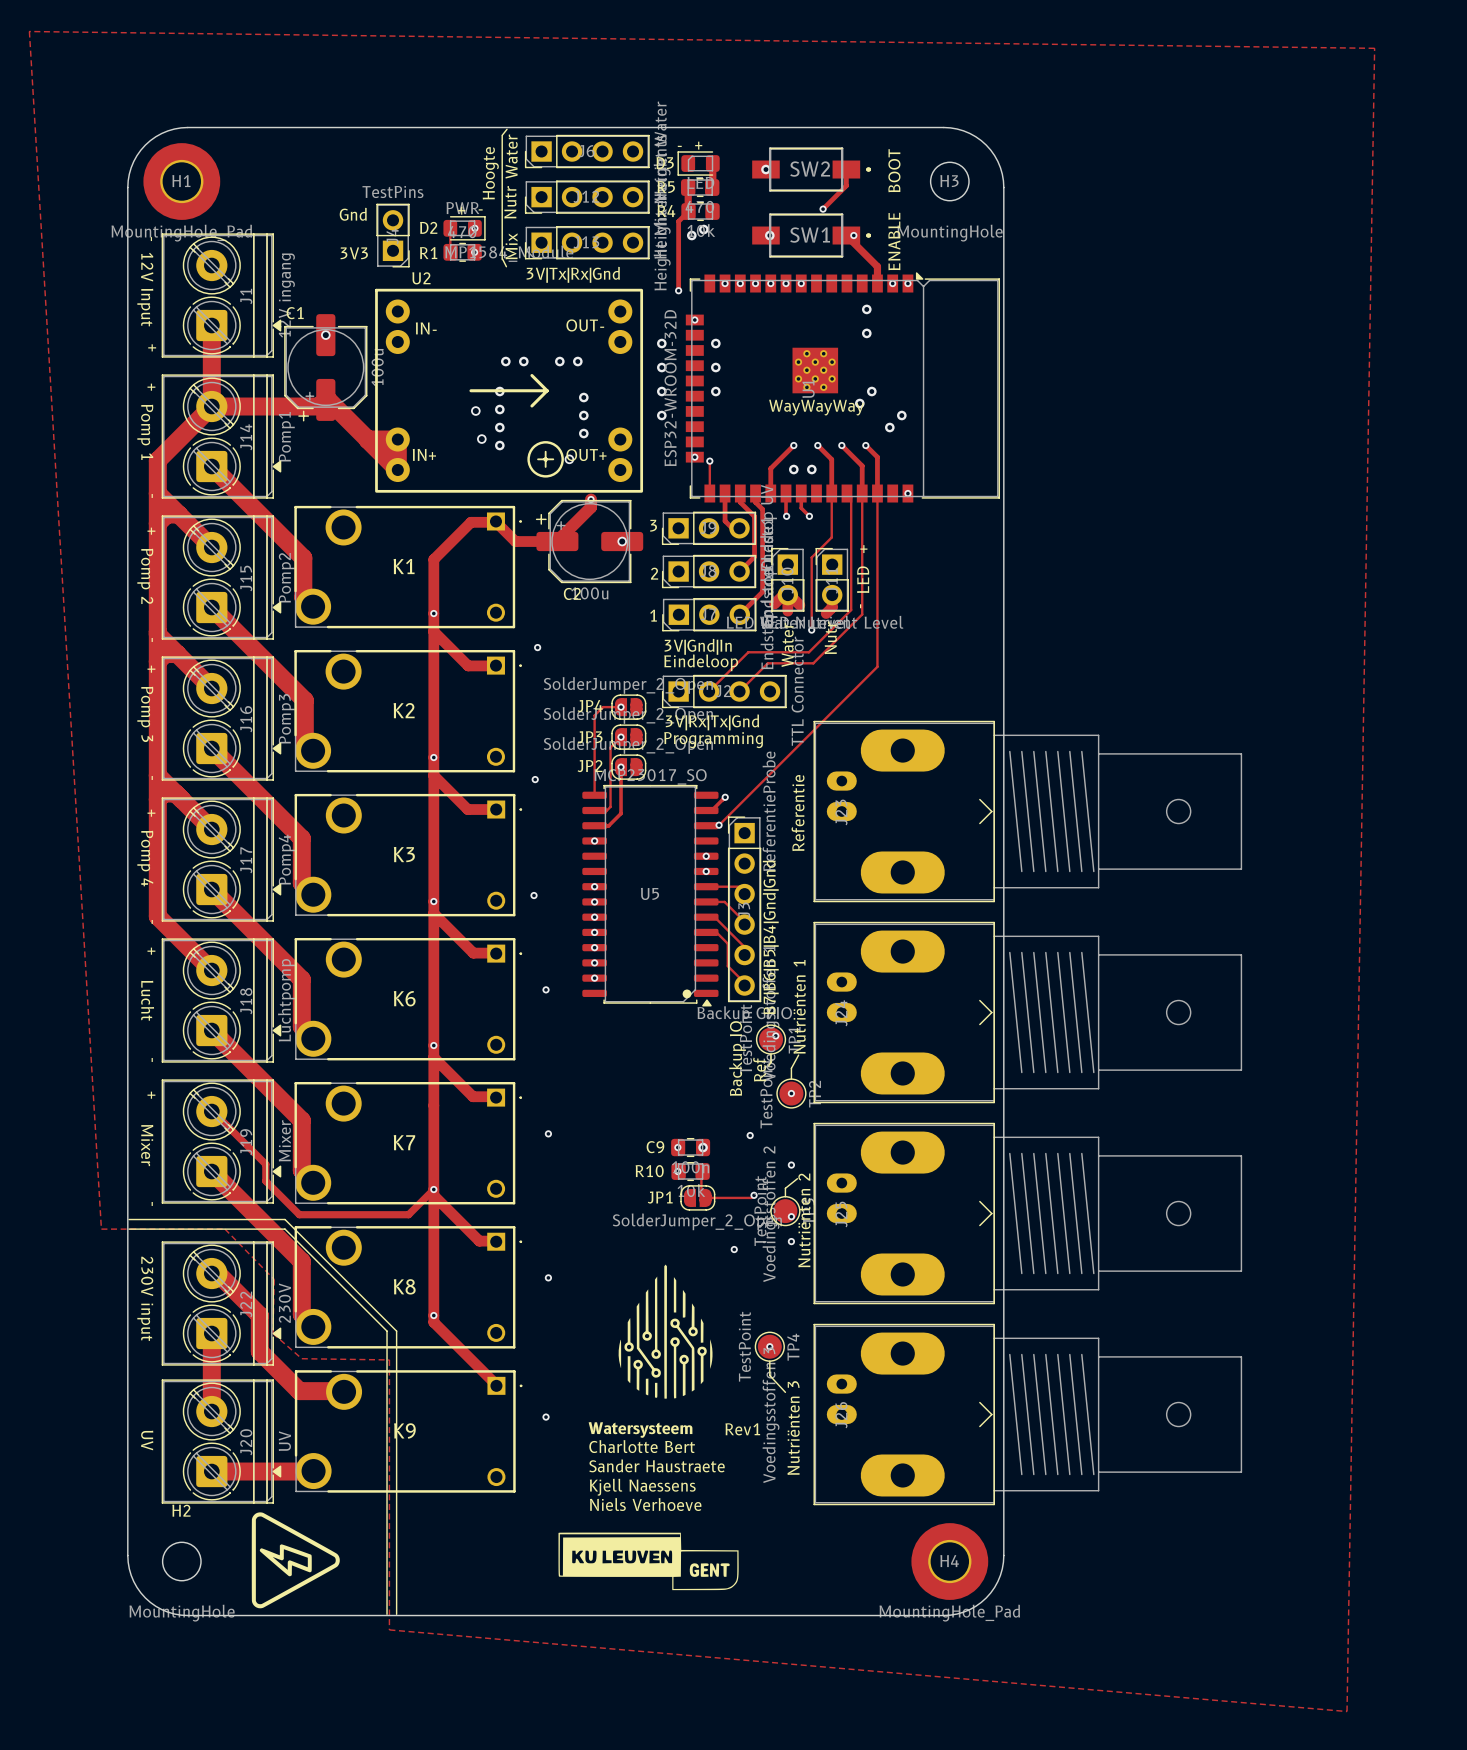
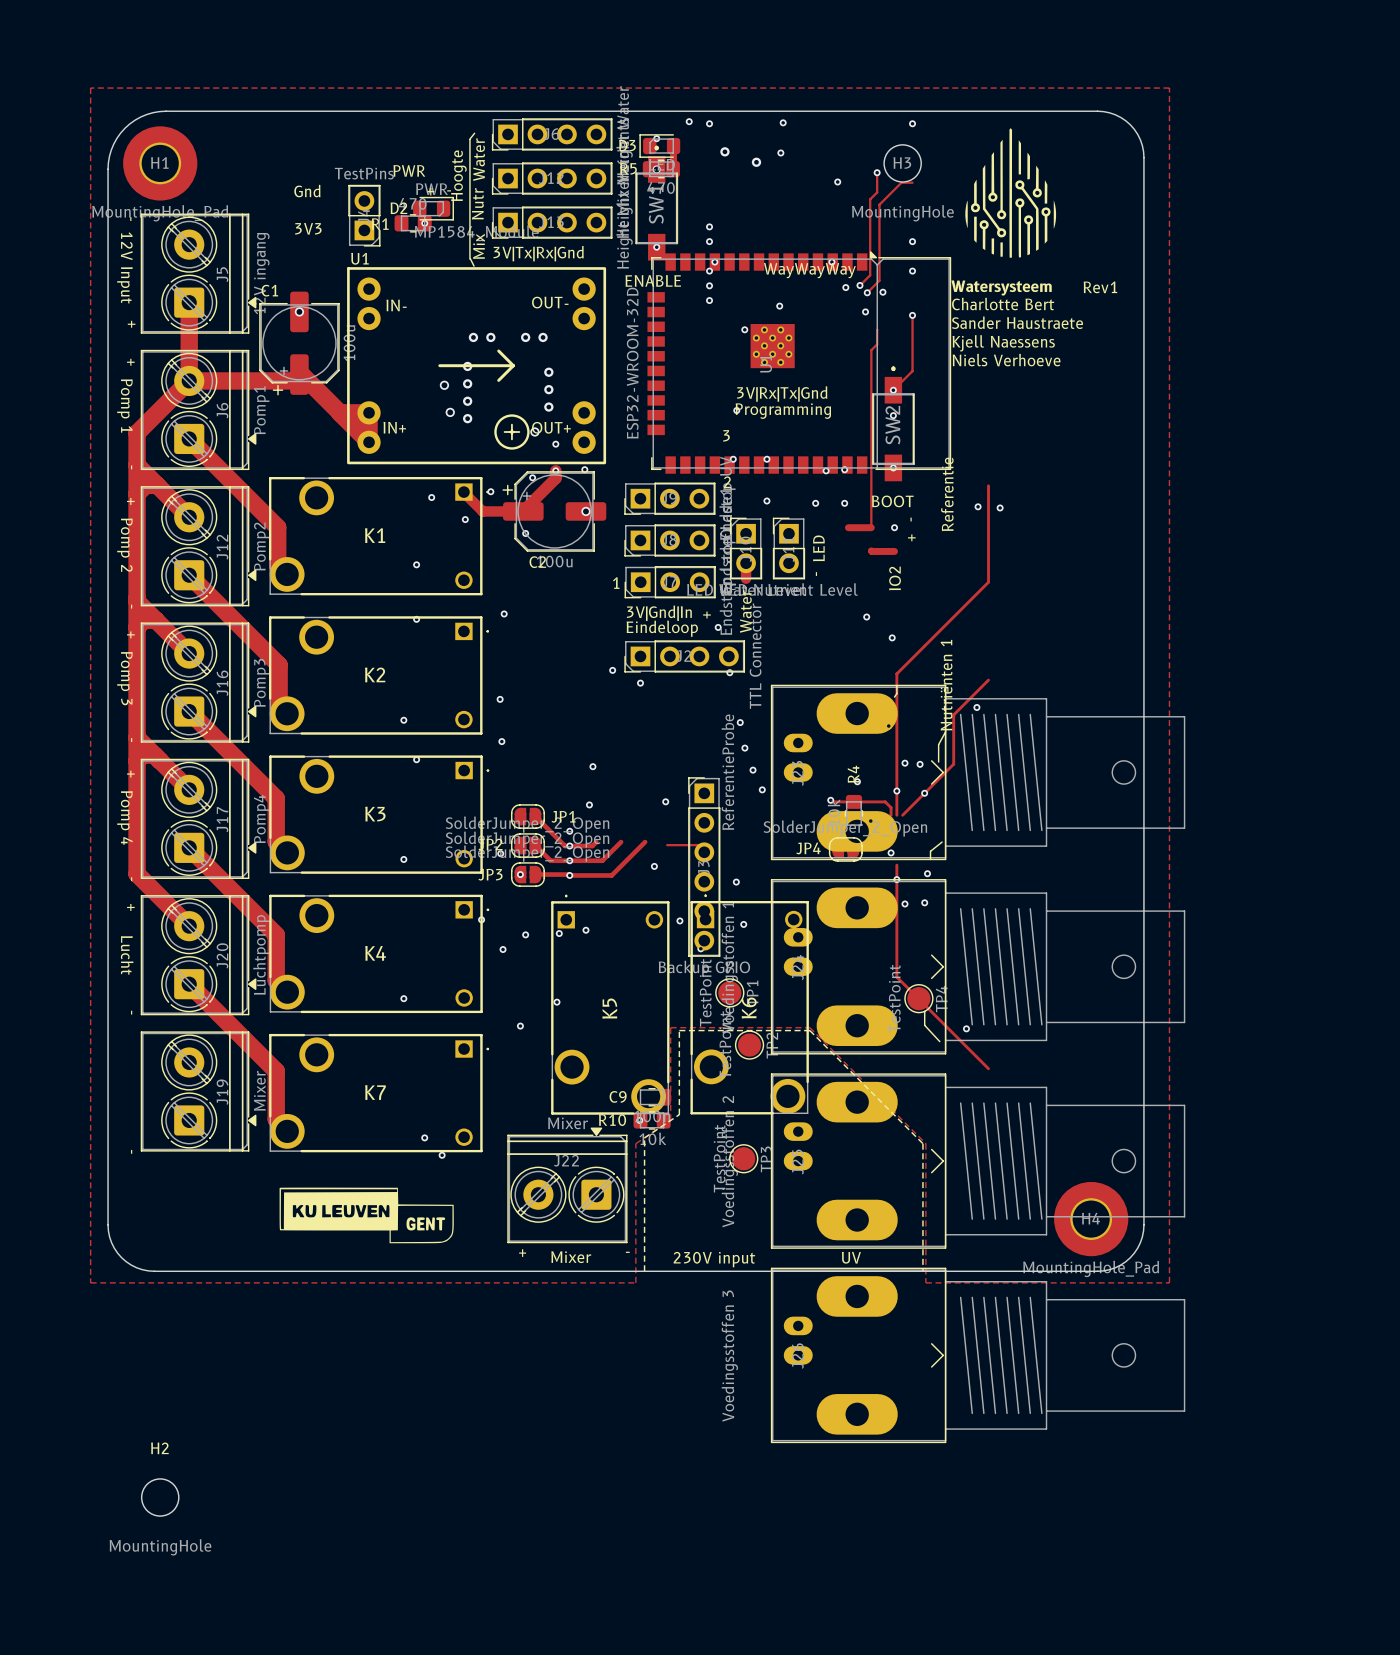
zone outline: (29, 31) (101, 1229) (225, 1229) (274, 1279) (273, 1333) (301, 1358) (389, 1359) (389, 1629) (1347, 1711) (1374, 48) (29, 31) -> (90, 88) (90, 1282) (635, 1282) (635, 1143) (670, 1120) (670, 1027) (809, 1027) (925, 1143) (925, 1282) (1169, 1282) (1169, 88) (90, 88)
board edge: (943, 127) (957, 129) (969, 133) (986, 145) (997, 161) (1002, 174) (1003, 187) (1003, 1555) (1002, 1568) (994, 1587) (981, 1602) (969, 1609) (957, 1614) (943, 1615) (187, 1615) (168, 1612) (150, 1602) (140, 1592) (133, 1581) (128, 1562) (127, 1279) -> (896, 111) (1103, 111) (1115, 114) (1125, 120) (1134, 129) (1142, 145) (1143, 157) (1143, 1224) (1142, 1236) (1134, 1253) (1120, 1265) (1109, 1269) (1097, 1271) (154, 1271) (136, 1267) (121, 1257) (111, 1242) (108, 1224)
line: (507, 129) (502, 135) -> (474, 133) (469, 139)
line: (502, 135) (502, 156) -> (469, 238) (469, 259)
via: none -> (689, 121)
via: none -> (783, 122)
via: none -> (709, 123)
via: none -> (912, 123)
drawing: none -> [965, 128, 1057, 258]
text: - + (690, 145) -> none
via: none -> (656, 138)
text position: Water (511, 156) -> Water (479, 159)
SW2 rotation: 0° (811, 169) -> 90° counterclockwise (893, 423)
SW2 position: (811, 169) -> (893, 423)
track: (846, 169) (846, 185) (823, 209) -> none
via: none -> (780, 152)
text: BOOT (894, 170) -> none
text position: Hoogte (490, 173) -> Hoogte (458, 175)
via: none -> (756, 162)
track: (688, 187) (688, 211) (678, 221) (678, 290) -> none
via: none -> (656, 169)
text: none -> PWR (409, 170)
track: none -> (877, 172) (877, 192) (870, 199) (870, 275) (859, 285)
via: none -> (877, 172)
via: none -> (837, 181)
track: none -> (912, 182) (901, 182) (879, 204) (879, 280) (867, 292)
text position: Nutr (510, 202) -> Nutr (477, 203)
via: (823, 209) -> none
R4 rotation: 0° (700, 211) -> 90° clockwise (853, 813)
R4 position: (700, 211) -> (853, 813)
text position: Gnd (353, 214) -> Gnd (307, 191)
via: (474, 228) -> none
via: (703, 229) -> none
via: (691, 235) -> none
via: (769, 235) -> none
SW1 rotation: 0° (811, 235) -> 90° counterclockwise (656, 203)
SW1 position: (811, 235) -> (656, 203)
track: (853, 235) (846, 235) (877, 266) (877, 283) -> none
via: (853, 235) -> none
text rotation: 0° (894, 241) -> 90° clockwise (653, 280)
text position: ENABLE (894, 241) -> ENABLE (653, 280)
via: none -> (424, 223)
text position: Mix (511, 246) -> Mix (478, 246)
via: none -> (709, 226)
R1 position: (462, 252) -> (413, 223)
via: (474, 252) -> none
text position: 3V3 (354, 253) -> 3V3 (308, 228)
line: (502, 259) (506, 266) -> (470, 259) (474, 266)
via: none -> (709, 241)
via: none -> (912, 241)
via: none -> (656, 247)
U2 name: U2 (421, 278) -> U1 (359, 258)
via: (725, 283) -> none
via: (740, 283) -> none
via: (770, 283) -> none
via: (786, 283) -> none
via: (801, 283) -> none
via: none -> (831, 262)
via: (892, 283) -> none
via: (907, 283) -> none
via: (678, 290) -> none
via: none -> (709, 271)
via: none -> (912, 271)
J1 name: J1 (246, 296) -> J5 (222, 274)
via: none -> (859, 285)
via: none -> (709, 285)
via: (866, 309) -> none
via: none -> (845, 287)
text: none -> Rev1 (1100, 287)
text: none -> Watersysteem (1001, 287)
via: none -> (882, 292)
via: none -> (867, 292)
via: (694, 320) -> none
via: none -> (709, 300)
text: none -> Charlotte Bert (1003, 304)
via: none -> (779, 306)
via: (866, 333) -> none
via: none -> (865, 311)
track: none -> (912, 315) (912, 371) (893, 390)
via: none -> (912, 315)
via: (661, 343) -> none
via: (715, 343) -> none
text: none -> Sander Haustraete (1017, 322)
via: none -> (744, 329)
track: none -> (877, 329) (877, 344) (871, 350) (871, 527) (848, 527)
via: (661, 367) -> none
via: (715, 367) -> none
text: none -> Kjell Naessens (1003, 343)
text: none -> Niels Verhoeve (1006, 360)
via: (661, 391) -> none
via: (715, 391) -> none
via: (871, 391) -> none
via: (859, 403) -> none
text position: WayWayWay (816, 407) -> WayWayWay (809, 270)
via: (661, 415) -> none
via: (901, 415) -> none
via: none -> (893, 390)
text: none -> 3V|Rx|Tx|Gnd (782, 394)
via: (889, 427) -> none
J14 name: J14 (246, 437) -> J6 (222, 410)
text: none -> Programming (783, 411)
via: none -> (893, 415)
track: (793, 445) (770, 468) (770, 493) -> none
via position: (793, 445) -> (736, 410)
track: (817, 445) (831, 459) (831, 537) (811, 557) (811, 630) -> none
via: (817, 445) -> none
track: (841, 445) (862, 465) (862, 614) (813, 663) (767, 663) (739, 691) -> none
via: (841, 445) -> none
track: (865, 445) (877, 457) (877, 666) (718, 825) (706, 825) -> none
via: (865, 445) -> none
via: (694, 457) -> none
track: (709, 461) (709, 493) -> none
via: (709, 461) -> none
via: (793, 469) -> none
via: (811, 469) -> none
via: none -> (555, 444)
via: none -> (733, 459)
via: none -> (766, 459)
track: (725, 493) (725, 521) (735, 531) (738, 531) (739, 528) -> none
track: (740, 493) (740, 502) (754, 516) (754, 556) (739, 571) -> none
track: (755, 493) (755, 502) (762, 509) (762, 591) (739, 614) -> none
track: (786, 493) (786, 516) -> none
track: (801, 493) (801, 508) (809, 516) -> none
track: (846, 493) (851, 497) (851, 610) (808, 652) (748, 652) (709, 691) -> none
via: (907, 493) -> none
via: none -> (893, 467)
via: none -> (584, 469)
via: none -> (844, 469)
via: none -> (826, 470)
via: none -> (532, 477)
track: none -> (988, 485) (988, 582) (896, 673) (896, 815)
via: (786, 516) -> none
via: (809, 516) -> none
track: (495, 521) (471, 522) (433, 559) (433, 1322) (496, 1385) -> none
via: none -> (490, 491)
text: none -> Referentie (947, 494)
text position: 3 (653, 525) -> 3 (726, 435)
via: none -> (431, 497)
via: none -> (766, 501)
text: none -> BOOT (892, 501)
via: none -> (815, 503)
via: none -> (844, 503)
via: none -> (978, 506)
via: none -> (1000, 507)
via: none -> (465, 519)
text rotation: 0° (863, 549) -> 90° counterclockwise (706, 615)
text position: + (863, 549) -> + (706, 615)
via: none -> (894, 527)
text: none -> - + (911, 529)
via: none -> (525, 533)
text position: 2 (654, 573) -> 2 (727, 482)
J15 name: J15 (246, 578) -> J12 (222, 547)
track: none -> (871, 550) (894, 551)
track: (832, 595) (832, 607) (826, 613) -> none
via: none -> (416, 564)
track: (774, 603) (783, 595) (789, 595) (799, 605) -> none
text: none -> IO2 (895, 578)
via: (433, 613) -> none
via: (811, 630) -> none
track: (433, 631) (468, 665) (495, 665) -> none
text: Nutr (830, 637) -> none
via: none -> (866, 617)
via: none -> (416, 619)
via: none -> (718, 627)
via: none -> (892, 637)
via: none -> (612, 670)
track: (621, 707) (603, 707) (594, 715) (594, 795) -> none
via: (621, 707) -> none
JP4 position: (628, 707) -> (845, 849)
via: none -> (729, 672)
track: none -> (988, 680) (953, 714) (953, 764) (902, 815)
via: none -> (640, 683)
line: none -> (896, 685) (896, 693) (894, 697)
text: none -> Nutriënten 1 (946, 685)
text: 3V|Rx|Tx|Gnd (712, 722) -> none
via: none -> (500, 699)
track: (621, 737) (610, 747) (610, 806) (606, 810) (594, 810) -> none
via: (621, 737) -> none
JP3 position: (628, 737) -> (527, 874)
text: Programming (713, 740) -> none
via: none -> (976, 707)
via: none -> (740, 722)
via: none -> (888, 726)
track: (621, 767) (621, 813) (608, 825) (594, 825) -> none
via: (621, 767) -> none
JP2 position: (628, 767) -> (527, 845)
line: none -> (945, 731) (938, 744) (938, 762)
track: (433, 775) (467, 809) (496, 809) -> none
via: none -> (744, 748)
via: (725, 797) -> none
via: none -> (416, 759)
track: (722, 799) (711, 810) (706, 810) -> none
via: none -> (904, 763)
via: none -> (920, 764)
via: none -> (592, 766)
via: none -> (753, 770)
text: Referentie (798, 813) -> none
via: none -> (857, 781)
via: (719, 825) -> none
via: none -> (762, 789)
via: none -> (896, 791)
via: none -> (924, 793)
via: (594, 840) -> none
track: none -> (830, 800) (832, 801) (885, 801) (891, 807) (891, 815)
via: none -> (830, 800)
via: none -> (665, 801)
via: none -> (589, 804)
track: none -> (879, 815) (876, 815) (870, 821)
via: (706, 856) -> none
track: none -> (535, 816) (564, 846) (592, 846) (596, 842)
via: none -> (870, 821)
via: (706, 871) -> none
via: none -> (569, 831)
track: none -> (621, 842) (602, 860) (550, 860) (535, 845)
track: none -> (645, 842) (611, 875) (535, 874)
line: none -> (942, 842) (930, 851) (930, 859)
via: (594, 886) -> none
via: none -> (569, 846)
via: none -> (891, 852)
U5: MCP23017_SO (650, 895) -> none
via: (594, 901) -> none
track: (706, 901) (724, 901) (744, 921) (744, 924) -> none
via: none -> (569, 860)
track: none -> (896, 865) (896, 977) (988, 1068)
via: none -> (654, 866)
track: (433, 913) (473, 953) (496, 953) -> none
via: none -> (927, 873)
via: none -> (520, 874)
via: (594, 917) -> none
track: (706, 917) (714, 917) (747, 949) (744, 955) -> none
via: none -> (569, 875)
via: none -> (896, 879)
via: none -> (736, 882)
via: (594, 932) -> none
track: (706, 932) (716, 932) (727, 943) (727, 966) (744, 982) (744, 985) -> none
text: B7|B6|B5|B4|Gnd|Gnd (770, 937) -> none
via: none -> (924, 902)
via: (594, 947) -> none
via: none -> (904, 903)
via: (594, 962) -> none
via: none -> (481, 919)
via: none -> (679, 920)
via: none -> (743, 924)
via: none -> (585, 930)
via: none -> (525, 934)
via: (546, 989) -> none
drawing: [682, 989, 692, 999] -> none
via: none -> (700, 948)
via: none -> (503, 949)
K6 name: K6 (404, 998) -> K4 (375, 953)
J18 name: J18 (246, 1001) -> J20 (222, 955)
text: Nutriënten 1 (799, 1006) -> none
via: (775, 1035) -> none
via: none -> (556, 1002)
K5: none -> (610, 1004)
K6: none -> (749, 1004)
line: (771, 1053) (771, 1062) (768, 1065) -> none
line: (798, 1055) (791, 1068) (791, 1079) -> none
track: (433, 1057) (473, 1096) (496, 1097) -> none
text: Backup IO (737, 1058) -> none
line: none -> (924, 1011) (924, 1025) (939, 1041)
text: Ref (759, 1069) -> none
via: none -> (520, 1026)
via: none -> (966, 1028)
via: (791, 1093) -> none
text: + (151, 1095) -> none
track: (211, 1111) (265, 1164) (265, 1181) (299, 1214) (408, 1214) (433, 1189) -> none
via: (548, 1133) -> none
via: (750, 1135) -> none
text: Mixer (147, 1145) -> none
via: (677, 1147) -> none
via: (703, 1147) -> none
via: (791, 1165) -> none
track: (211, 1171) (301, 1261) (301, 1314) (313, 1326) -> none
track: (702, 1171) (701, 1194) (704, 1197) (751, 1197) (754, 1195) -> none
line: (797, 1178) (785, 1188) (785, 1196) -> none
via position: (433, 1189) -> (424, 1137)
track: (433, 1195) (479, 1241) (496, 1241) -> none
via: (754, 1195) -> none
JP1 name position: JP1 (660, 1197) -> JP1 (563, 816)
JP1 position: (697, 1197) -> (527, 816)
via: none -> (442, 1155)
via: (791, 1216) -> none
line: (129, 1219) (285, 1219) (396, 1331) (396, 1614) -> none
text: Nutriënten 2 (804, 1220) -> none
line: (129, 1229) (285, 1229) (387, 1331) (387, 1614) -> none
drawing: none -> [279, 1187, 454, 1244]
via: (791, 1241) -> none
via: (734, 1249) -> none
drawing: [618, 1264, 713, 1399] -> none
track: (211, 1273) (217, 1273) (259, 1315) (259, 1351) (299, 1391) (344, 1391) -> none
via: (548, 1277) -> none
K8: (408, 1287) -> none
text: 230V input (145, 1298) -> none
J22 rotation: 0° (221, 1303) -> 90° counterclockwise (567, 1185)
J22 position: (221, 1303) -> (567, 1185)
J22 value: 230V (284, 1303) -> Mixer (568, 1123)
text: none -> - (627, 1252)
text: none -> + (522, 1253)
text: none -> Mixer (571, 1257)
text: none -> UV (851, 1257)
via: (433, 1315) -> none
text: none -> 230V input (714, 1259)
line: none -> (644, 1271) (644, 1137) (679, 1114) (679, 1030) (809, 1030) (922, 1143) (922, 1271)
track: (211, 1333) (211, 1411) -> none
TP4 position: (769, 1346) -> (918, 998)
via: (769, 1346) -> none
line: (769, 1361) (769, 1375) (785, 1392) -> none
via: (546, 1417) -> none
text: Nutriënten 3 (793, 1428) -> none
text: Watersysteem (640, 1429) -> none
text: Rev1 (742, 1429) -> none
K9: (408, 1431) -> none
text: UV (147, 1440) -> none
J20: UV (221, 1441) -> none
text: Charlotte Bert (642, 1446) -> none
text: Sander Haustraete (656, 1465) -> none
track: (313, 1471) (211, 1471) -> none
text: Kjell Naessens (642, 1487) -> none
text: Niels Verhoeve (645, 1504) -> none
drawing: [251, 1512, 340, 1609] -> none
drawing: [558, 1532, 739, 1591] -> none
H4 position: (949, 1561) -> (1091, 1219)

